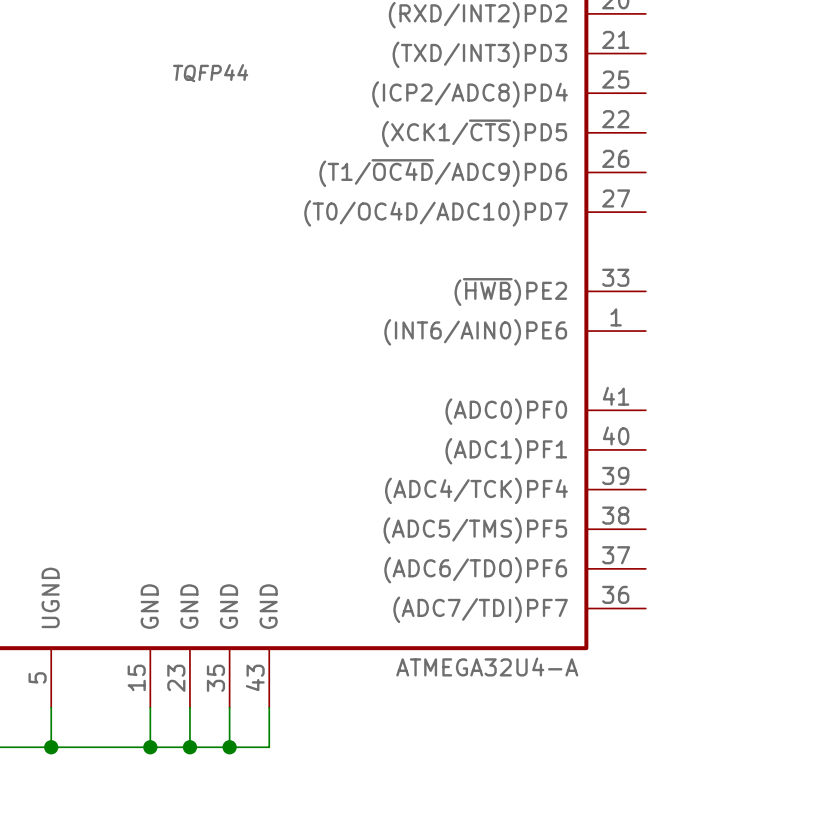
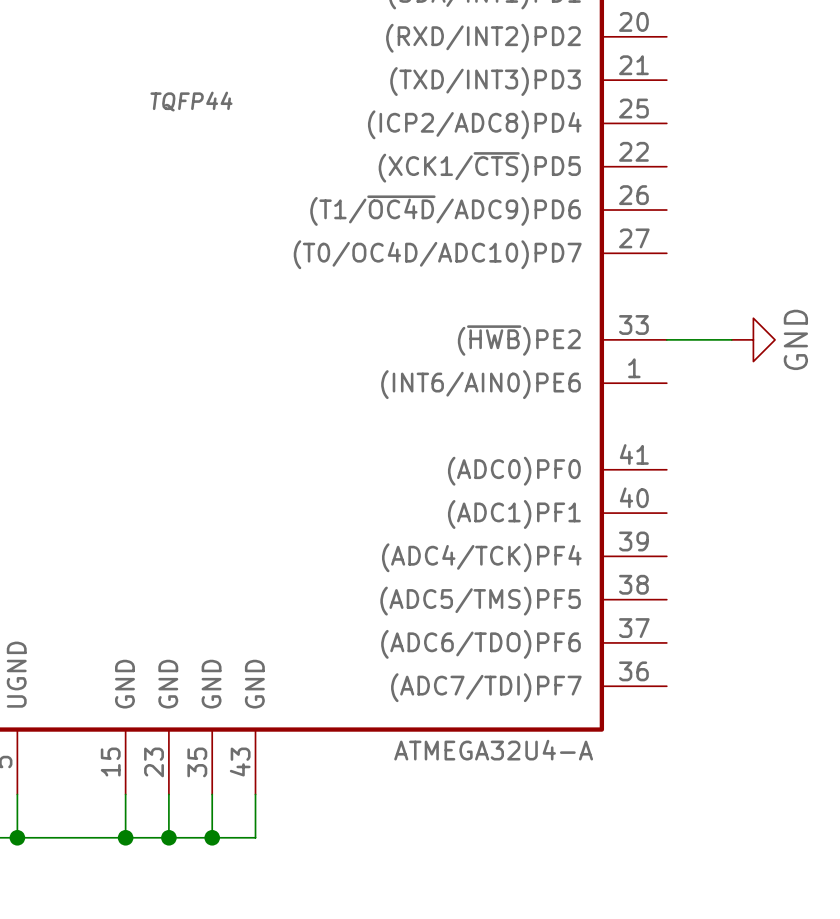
wire: none -> (666, 339) (731, 339)
power symbol: none -> GND (753, 339)

